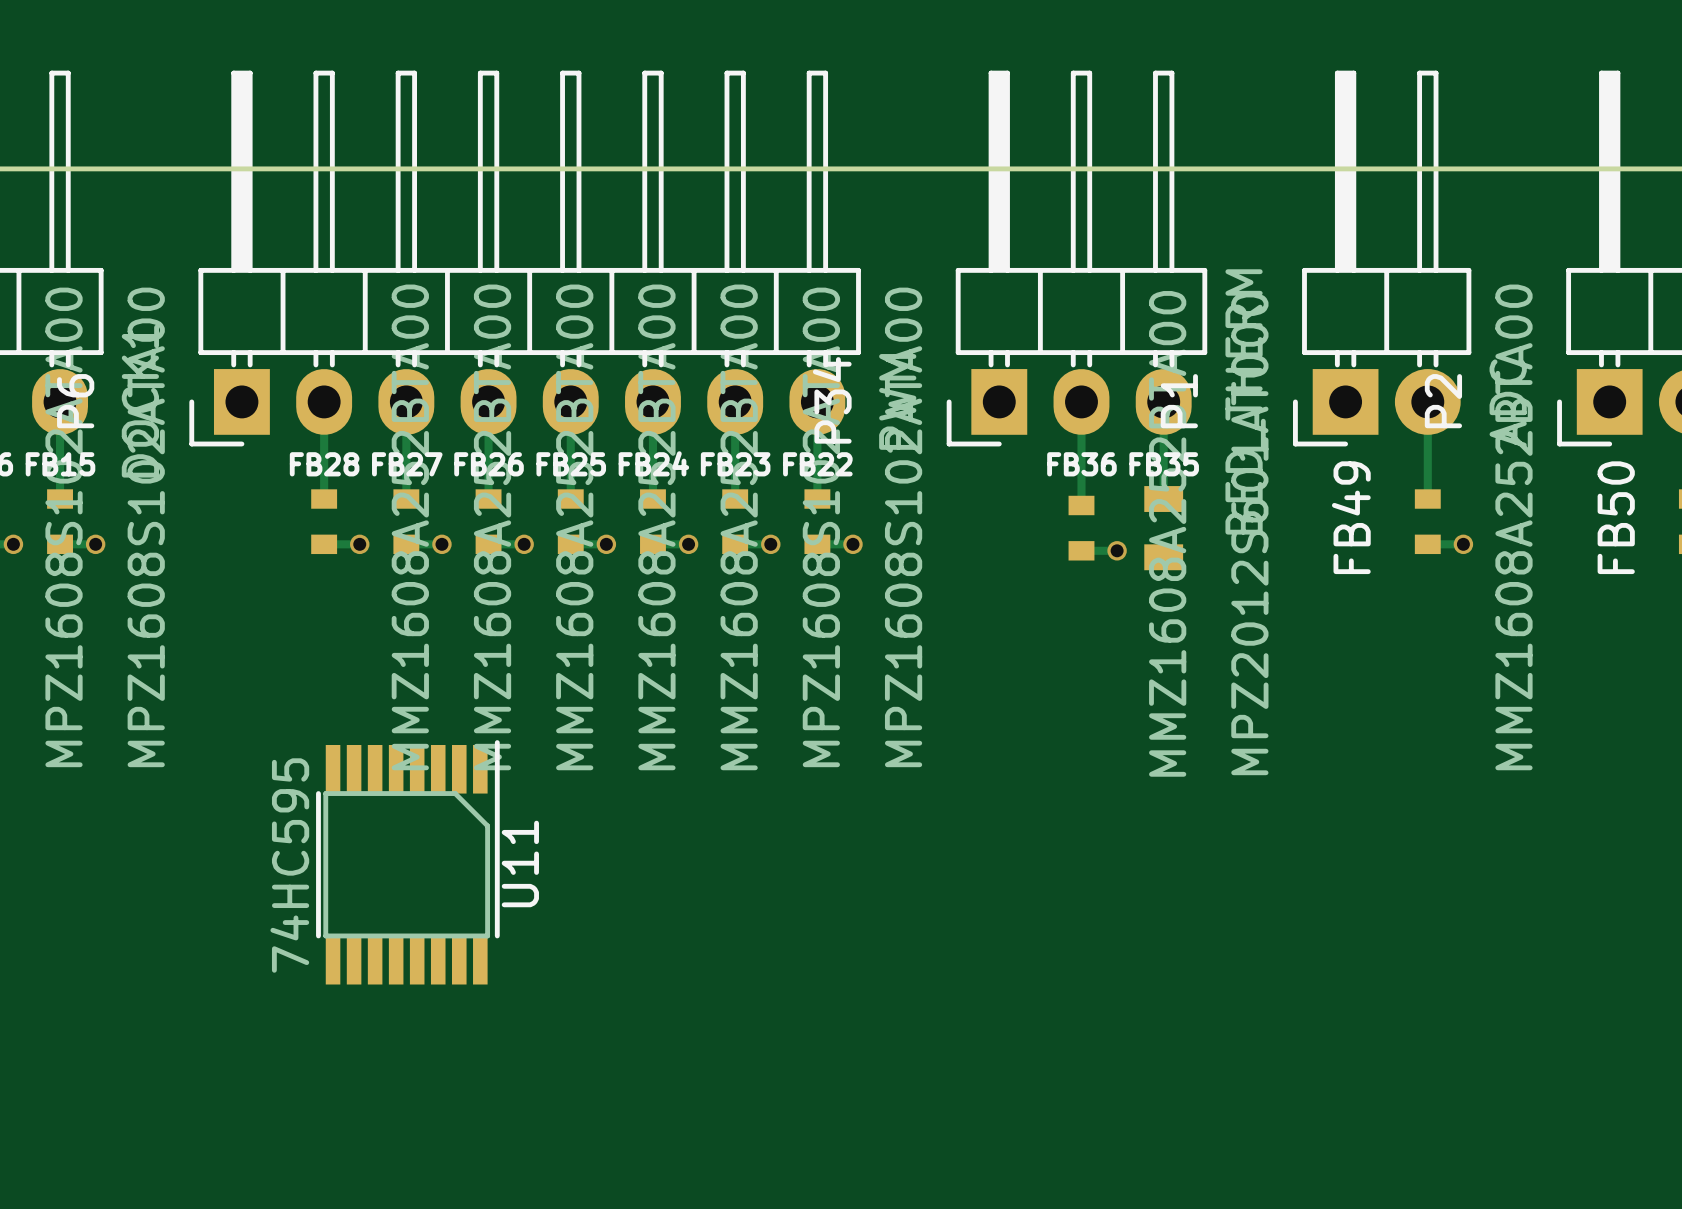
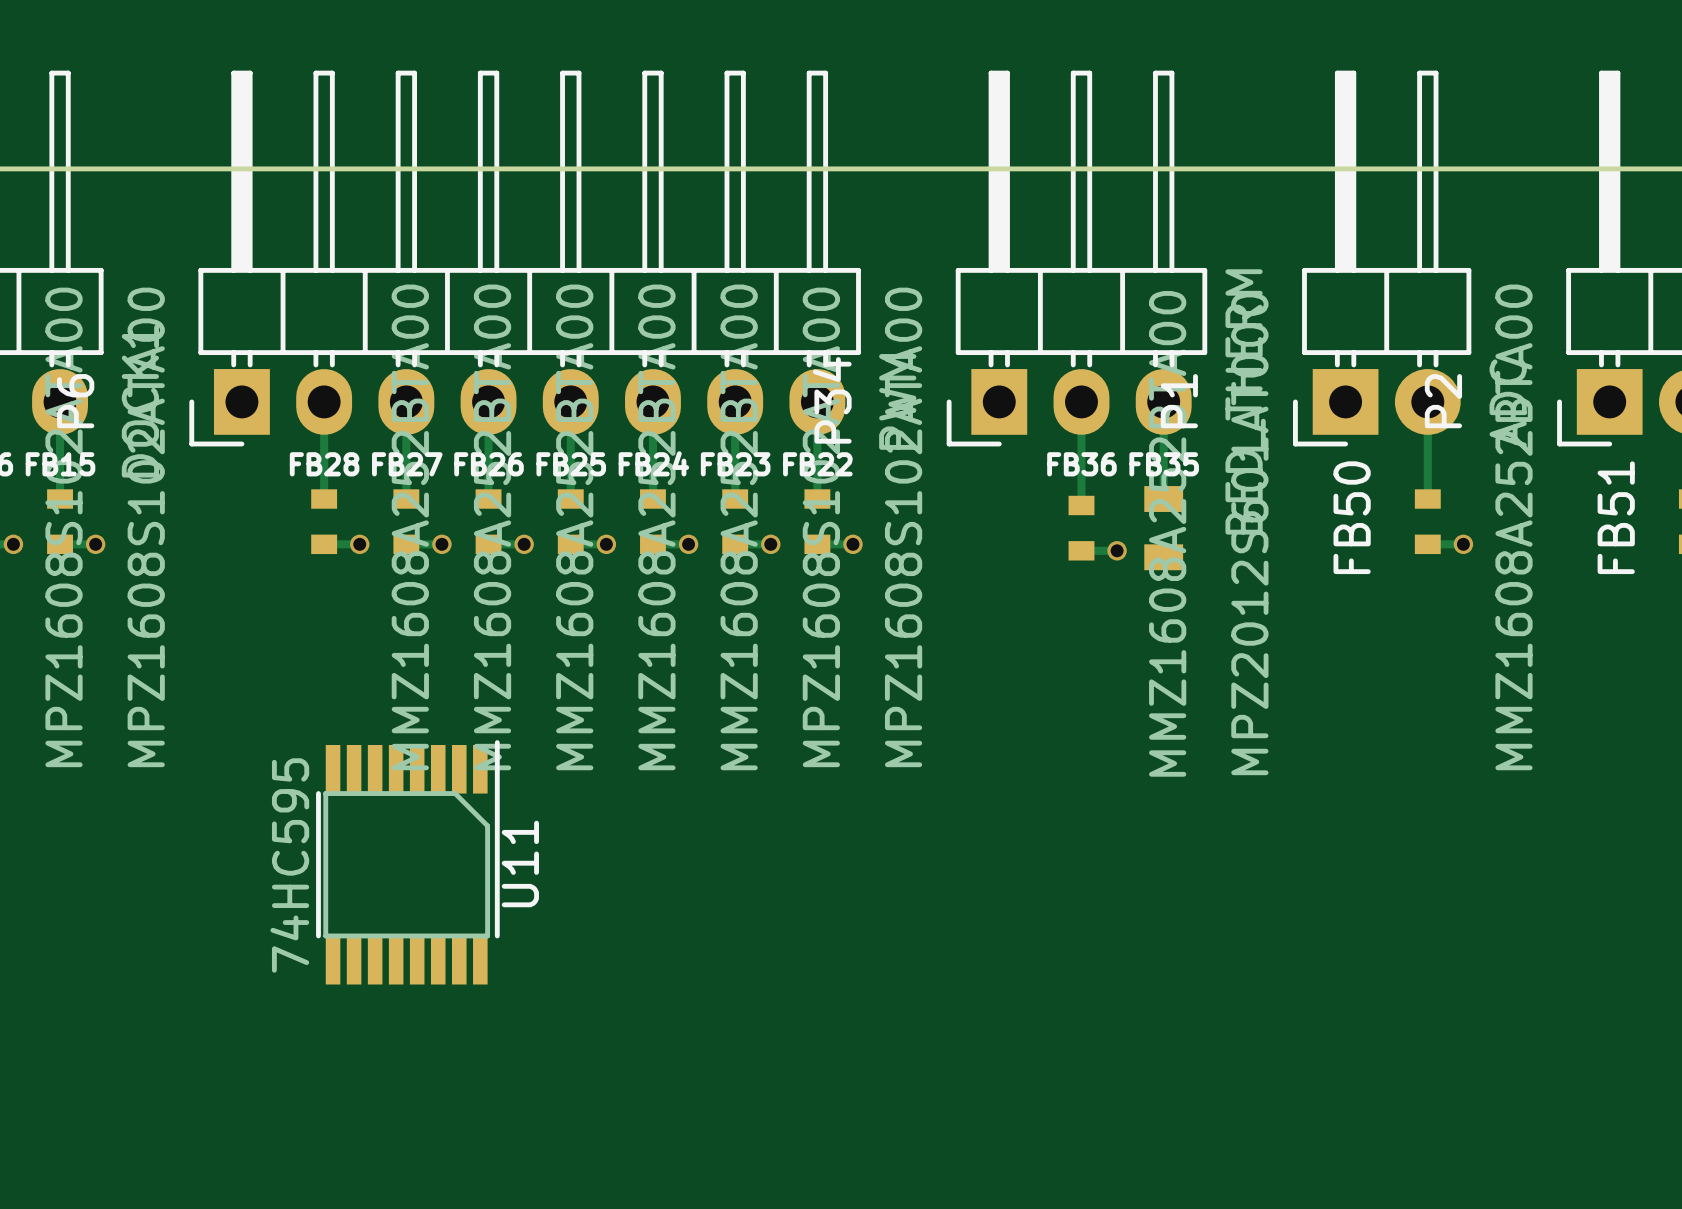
FB49 name: FB49 (1351, 517) -> FB50 (1352, 517)
FB50 name: FB50 (1616, 517) -> FB51 (1616, 517)

